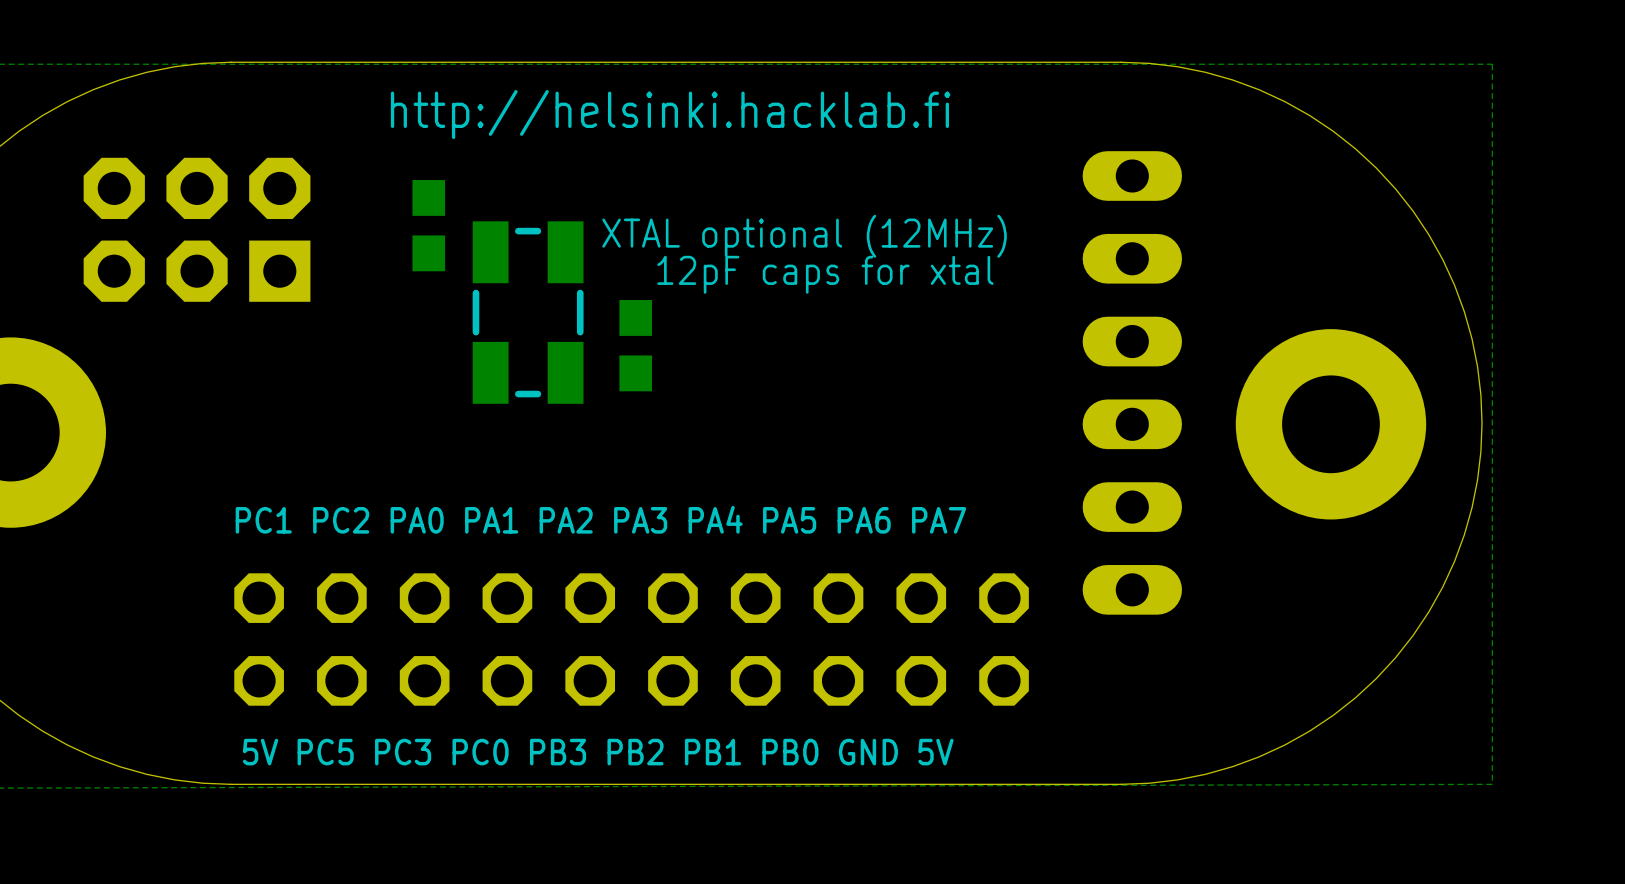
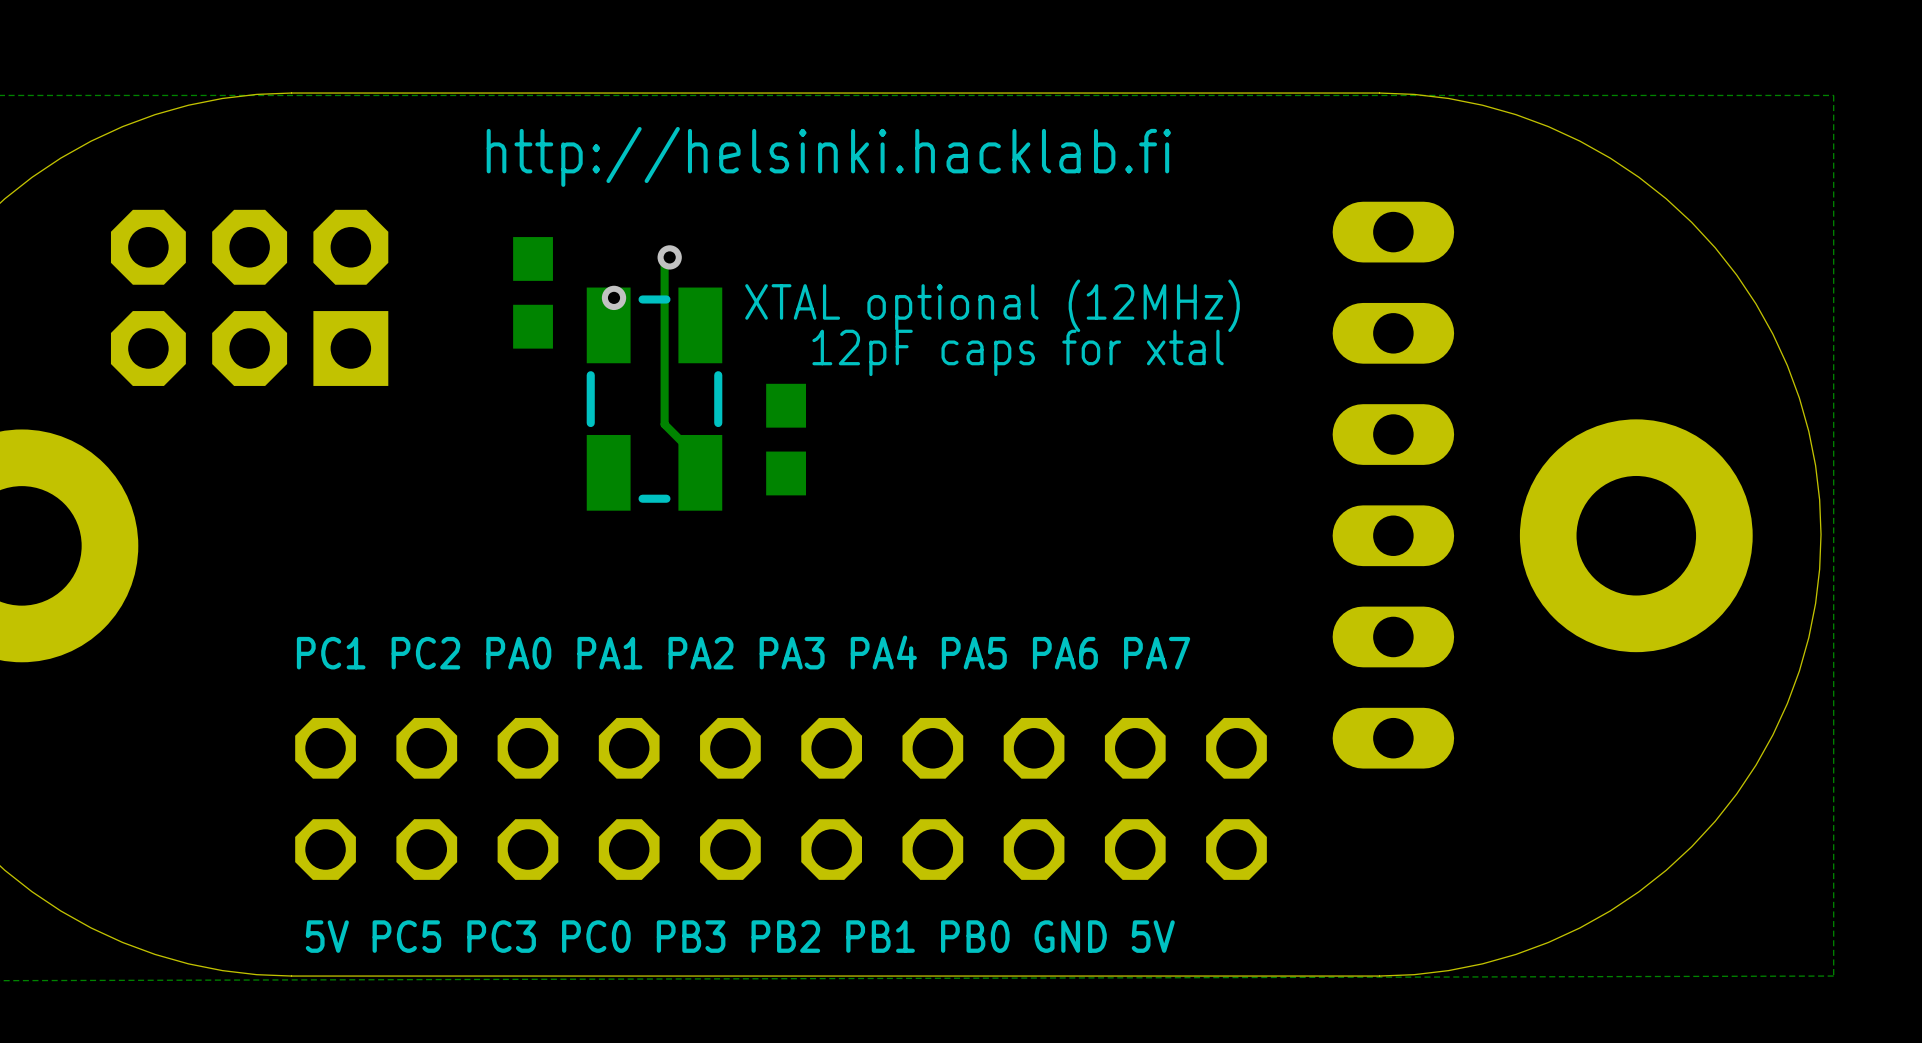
track: none -> (669, 257) (664, 262) (664, 424) (700, 460) (700, 472)
via: none -> (669, 257)
via: none -> (614, 297)

